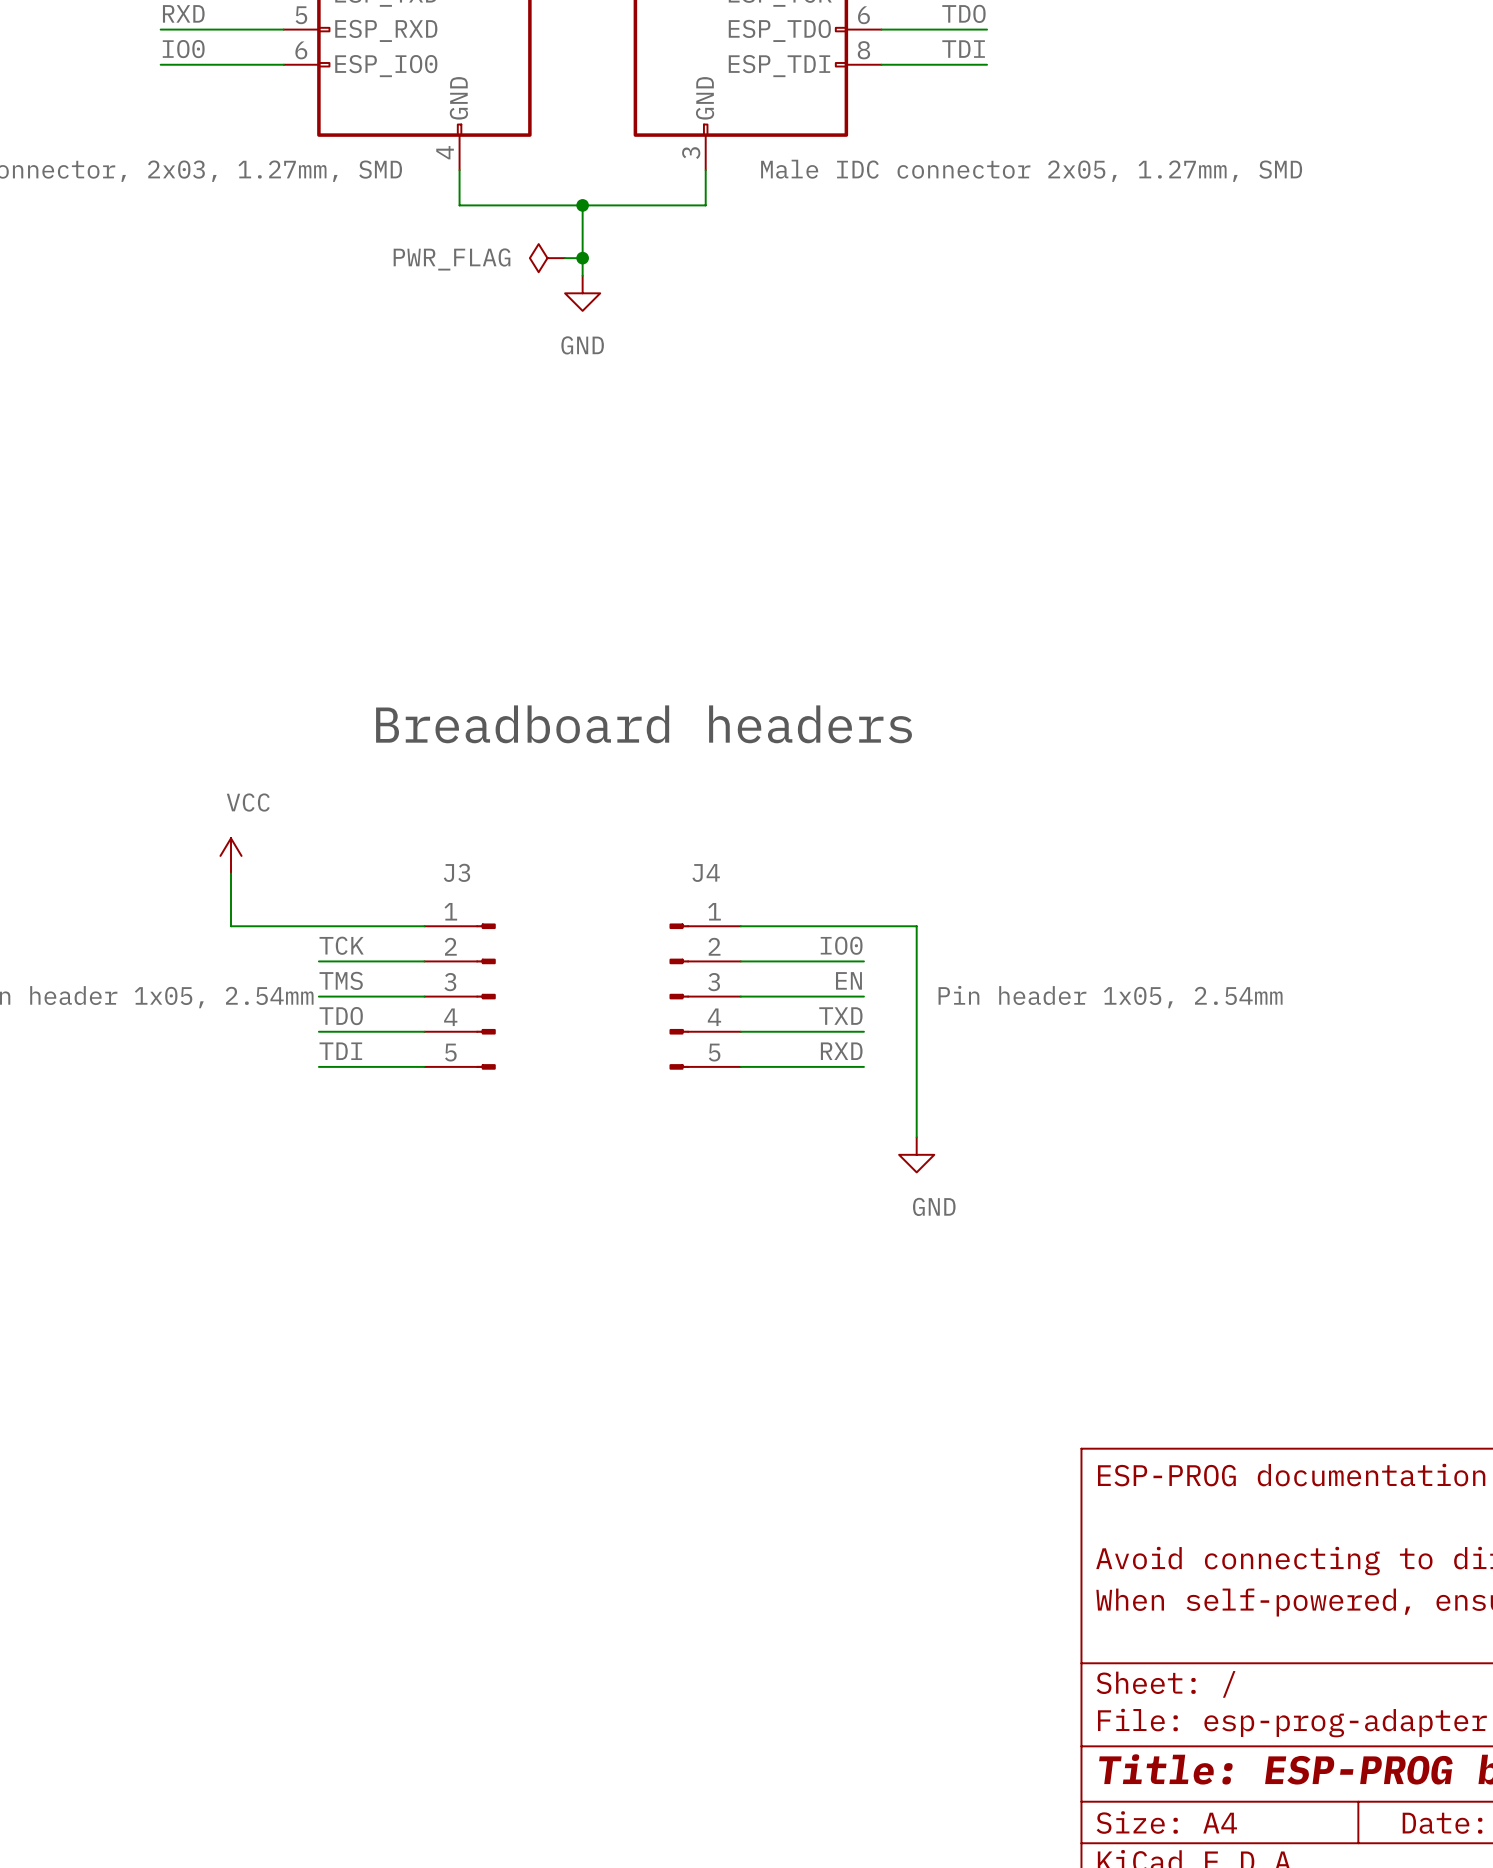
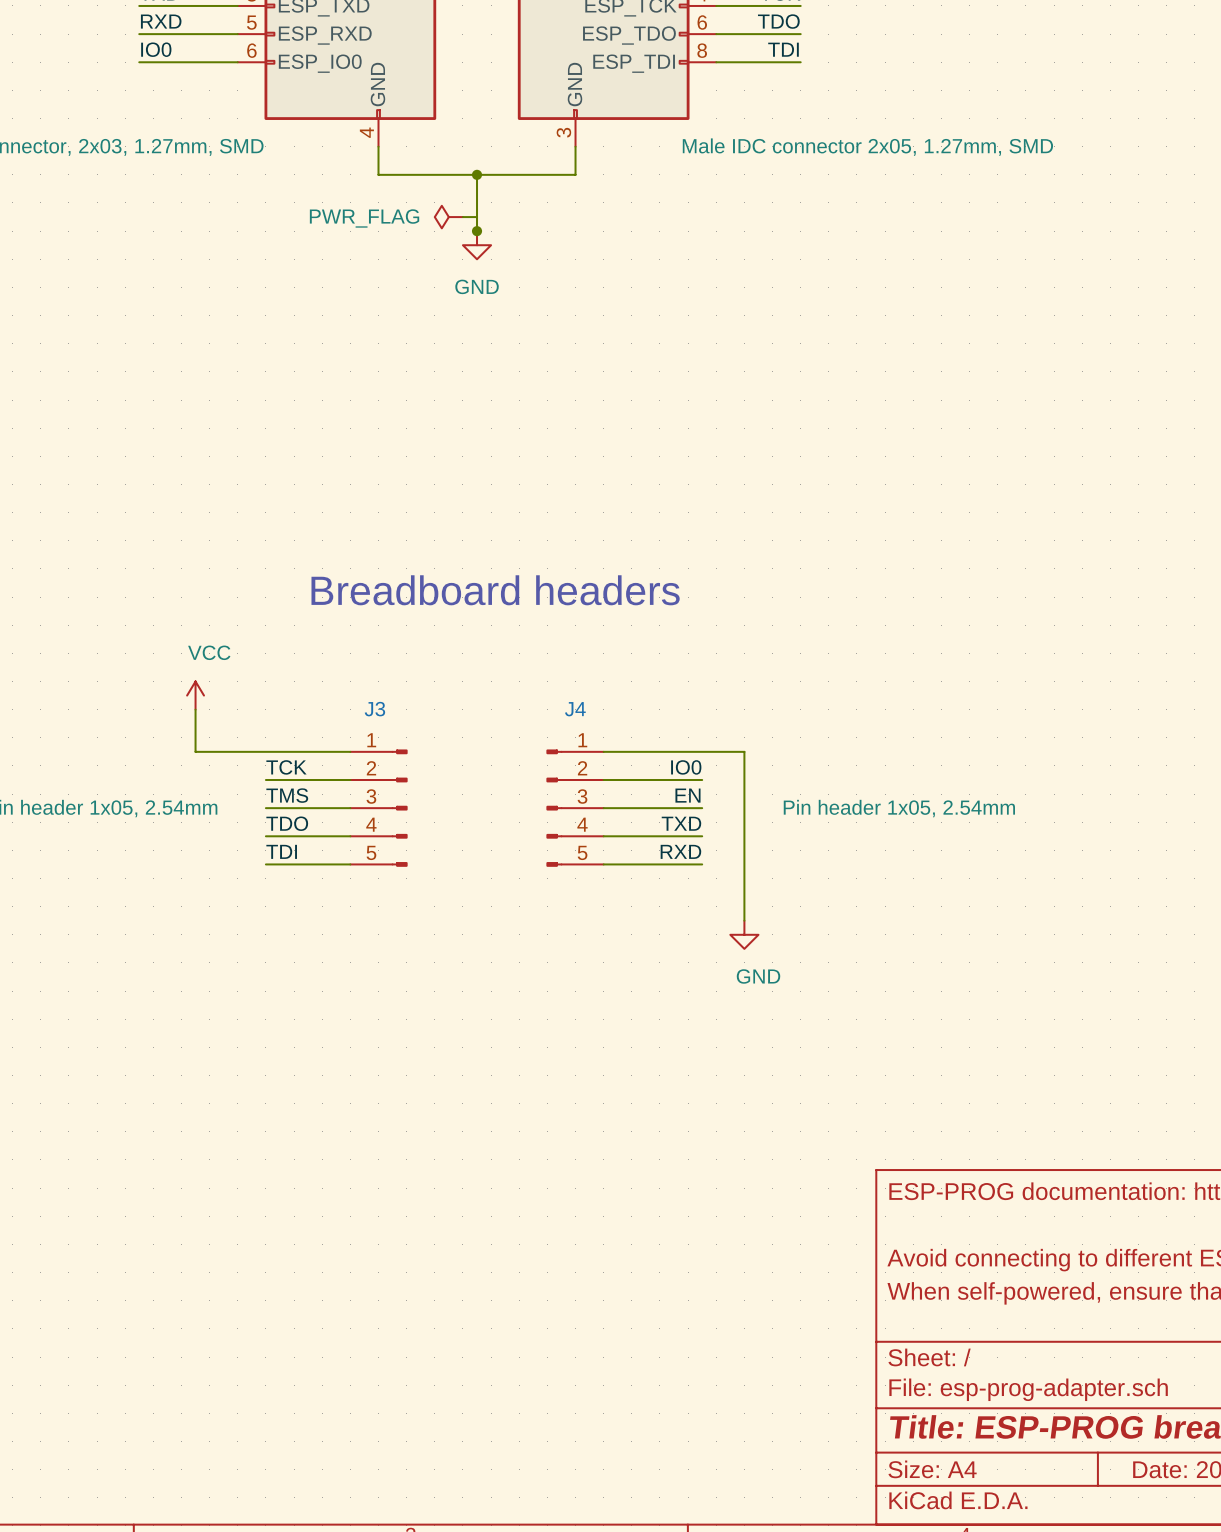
junction position: (582, 258) -> (477, 231)

